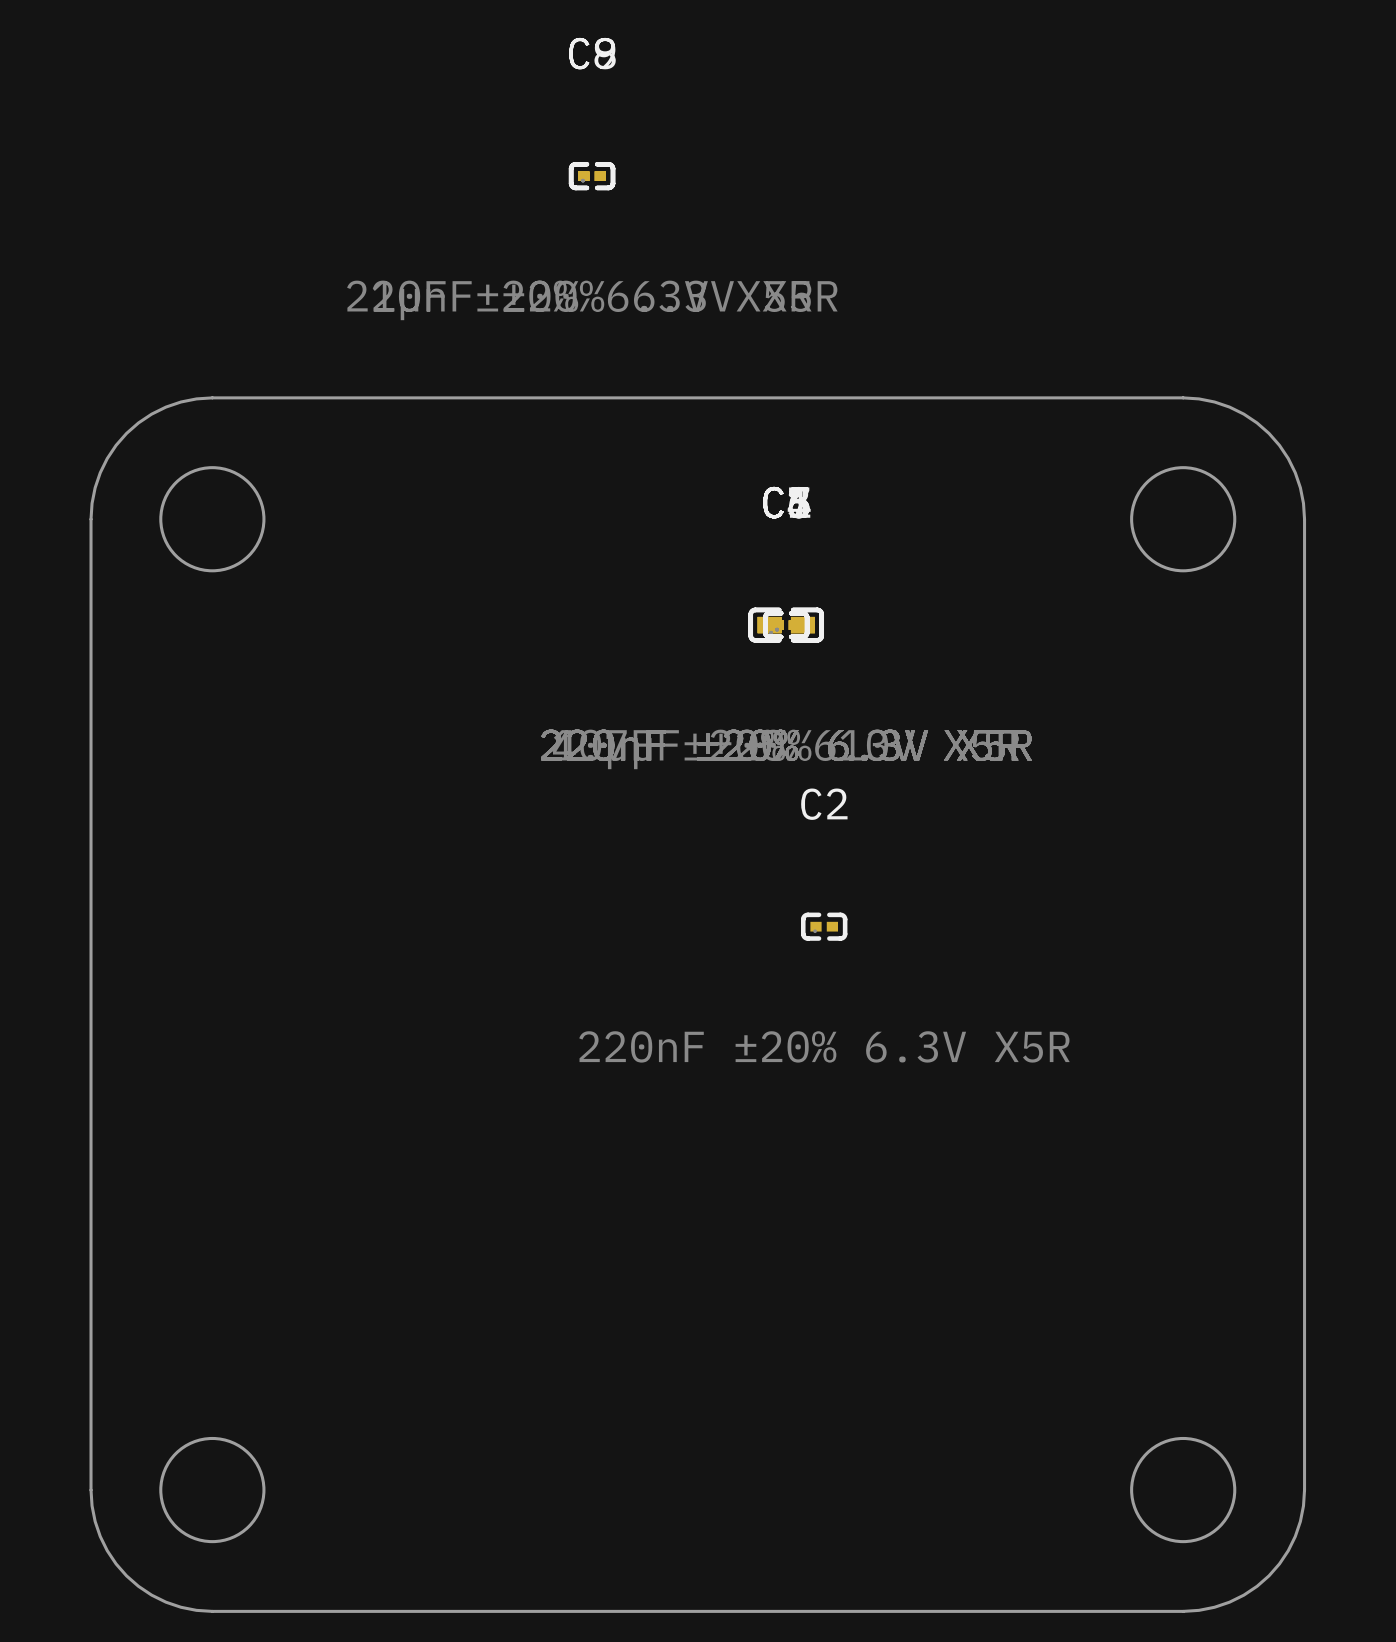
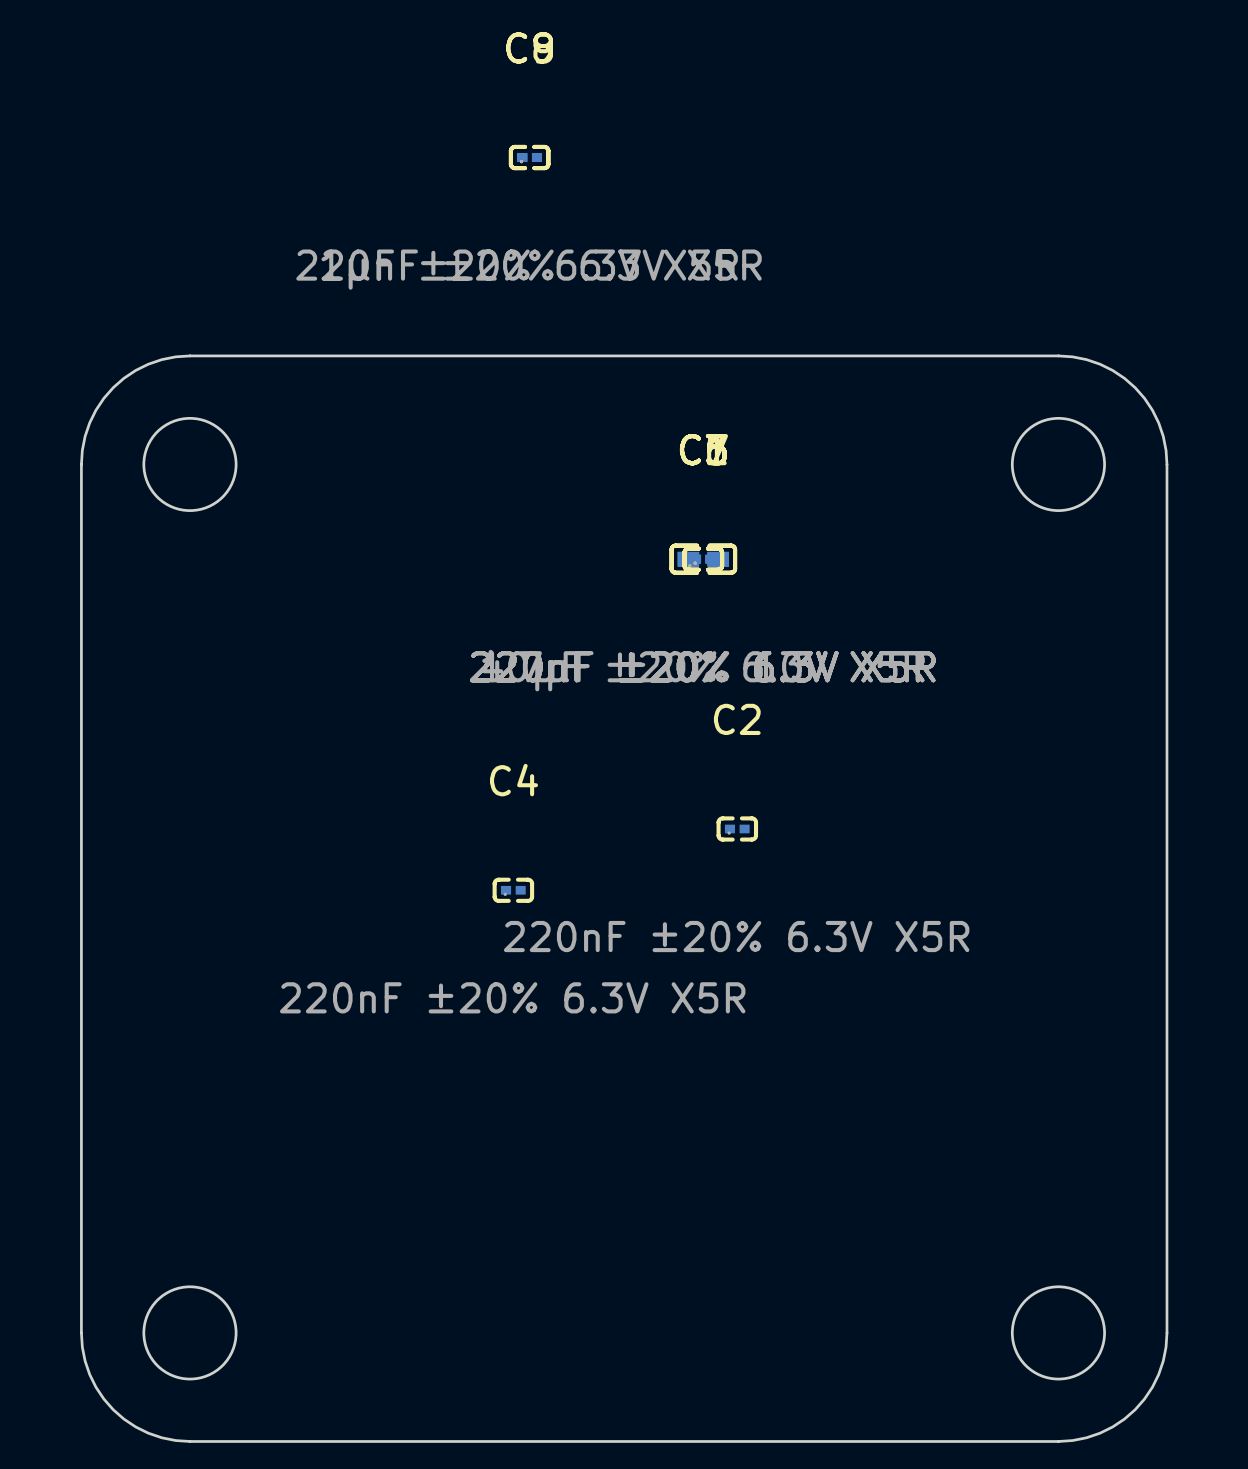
C4 position: (786, 625) -> (513, 890)

